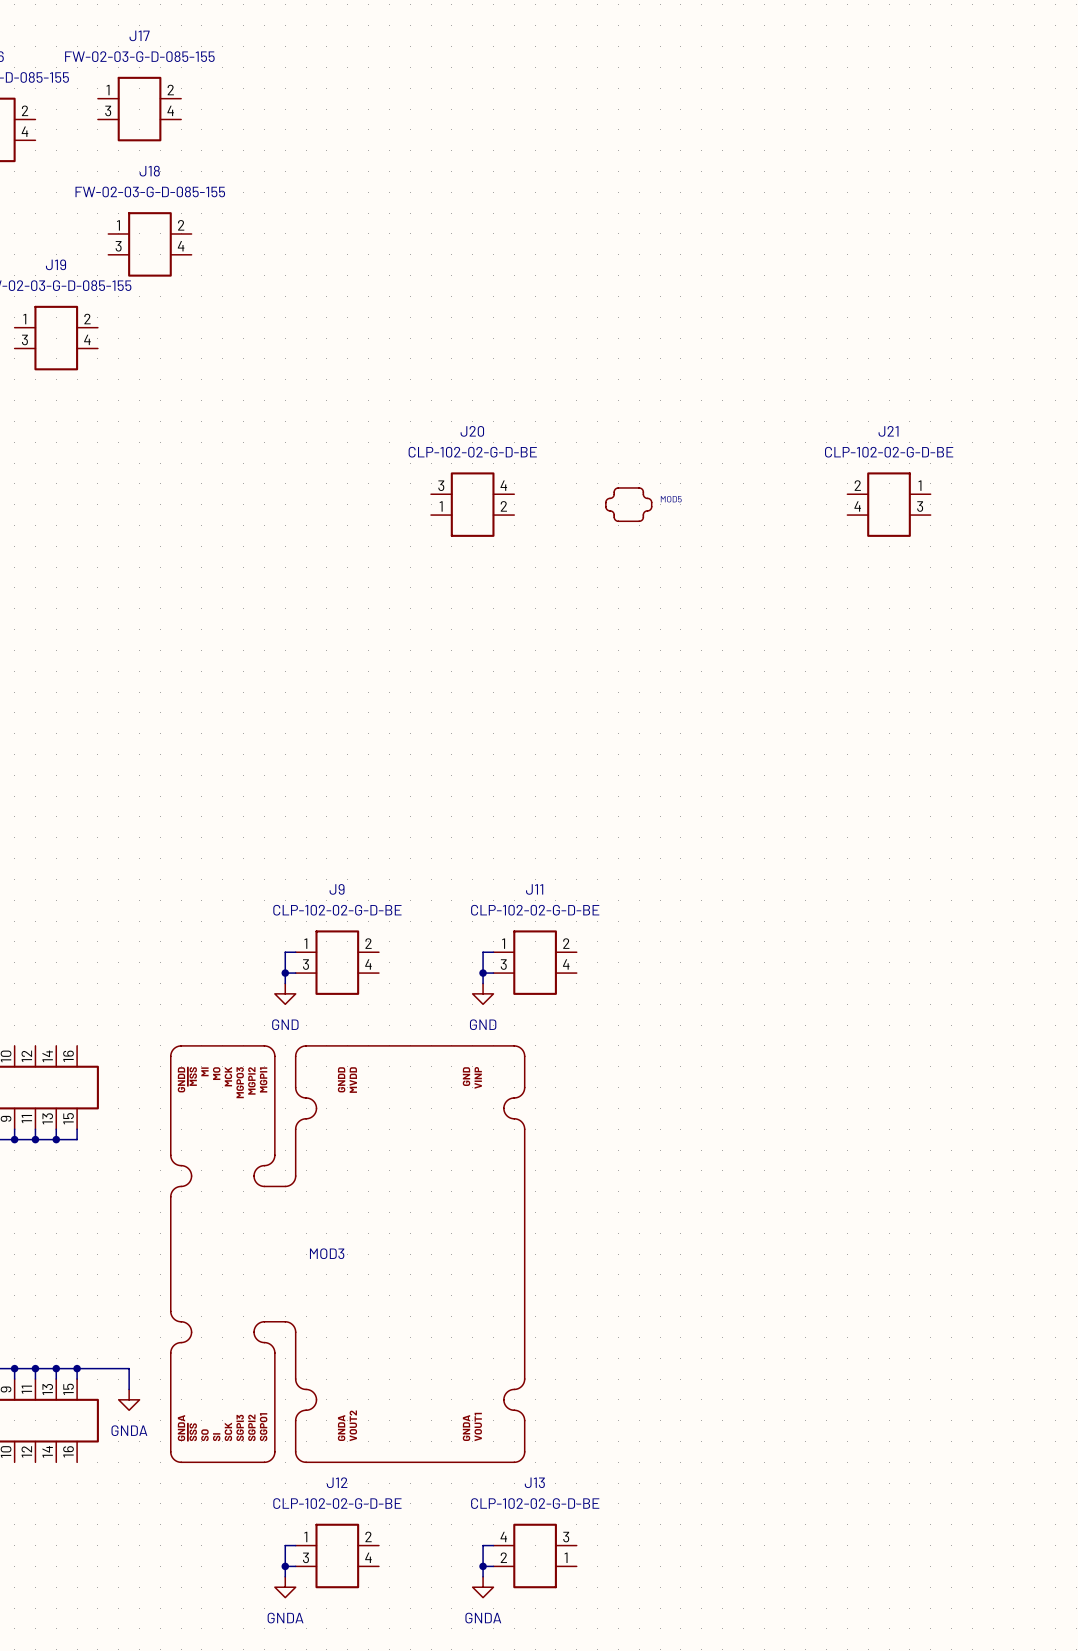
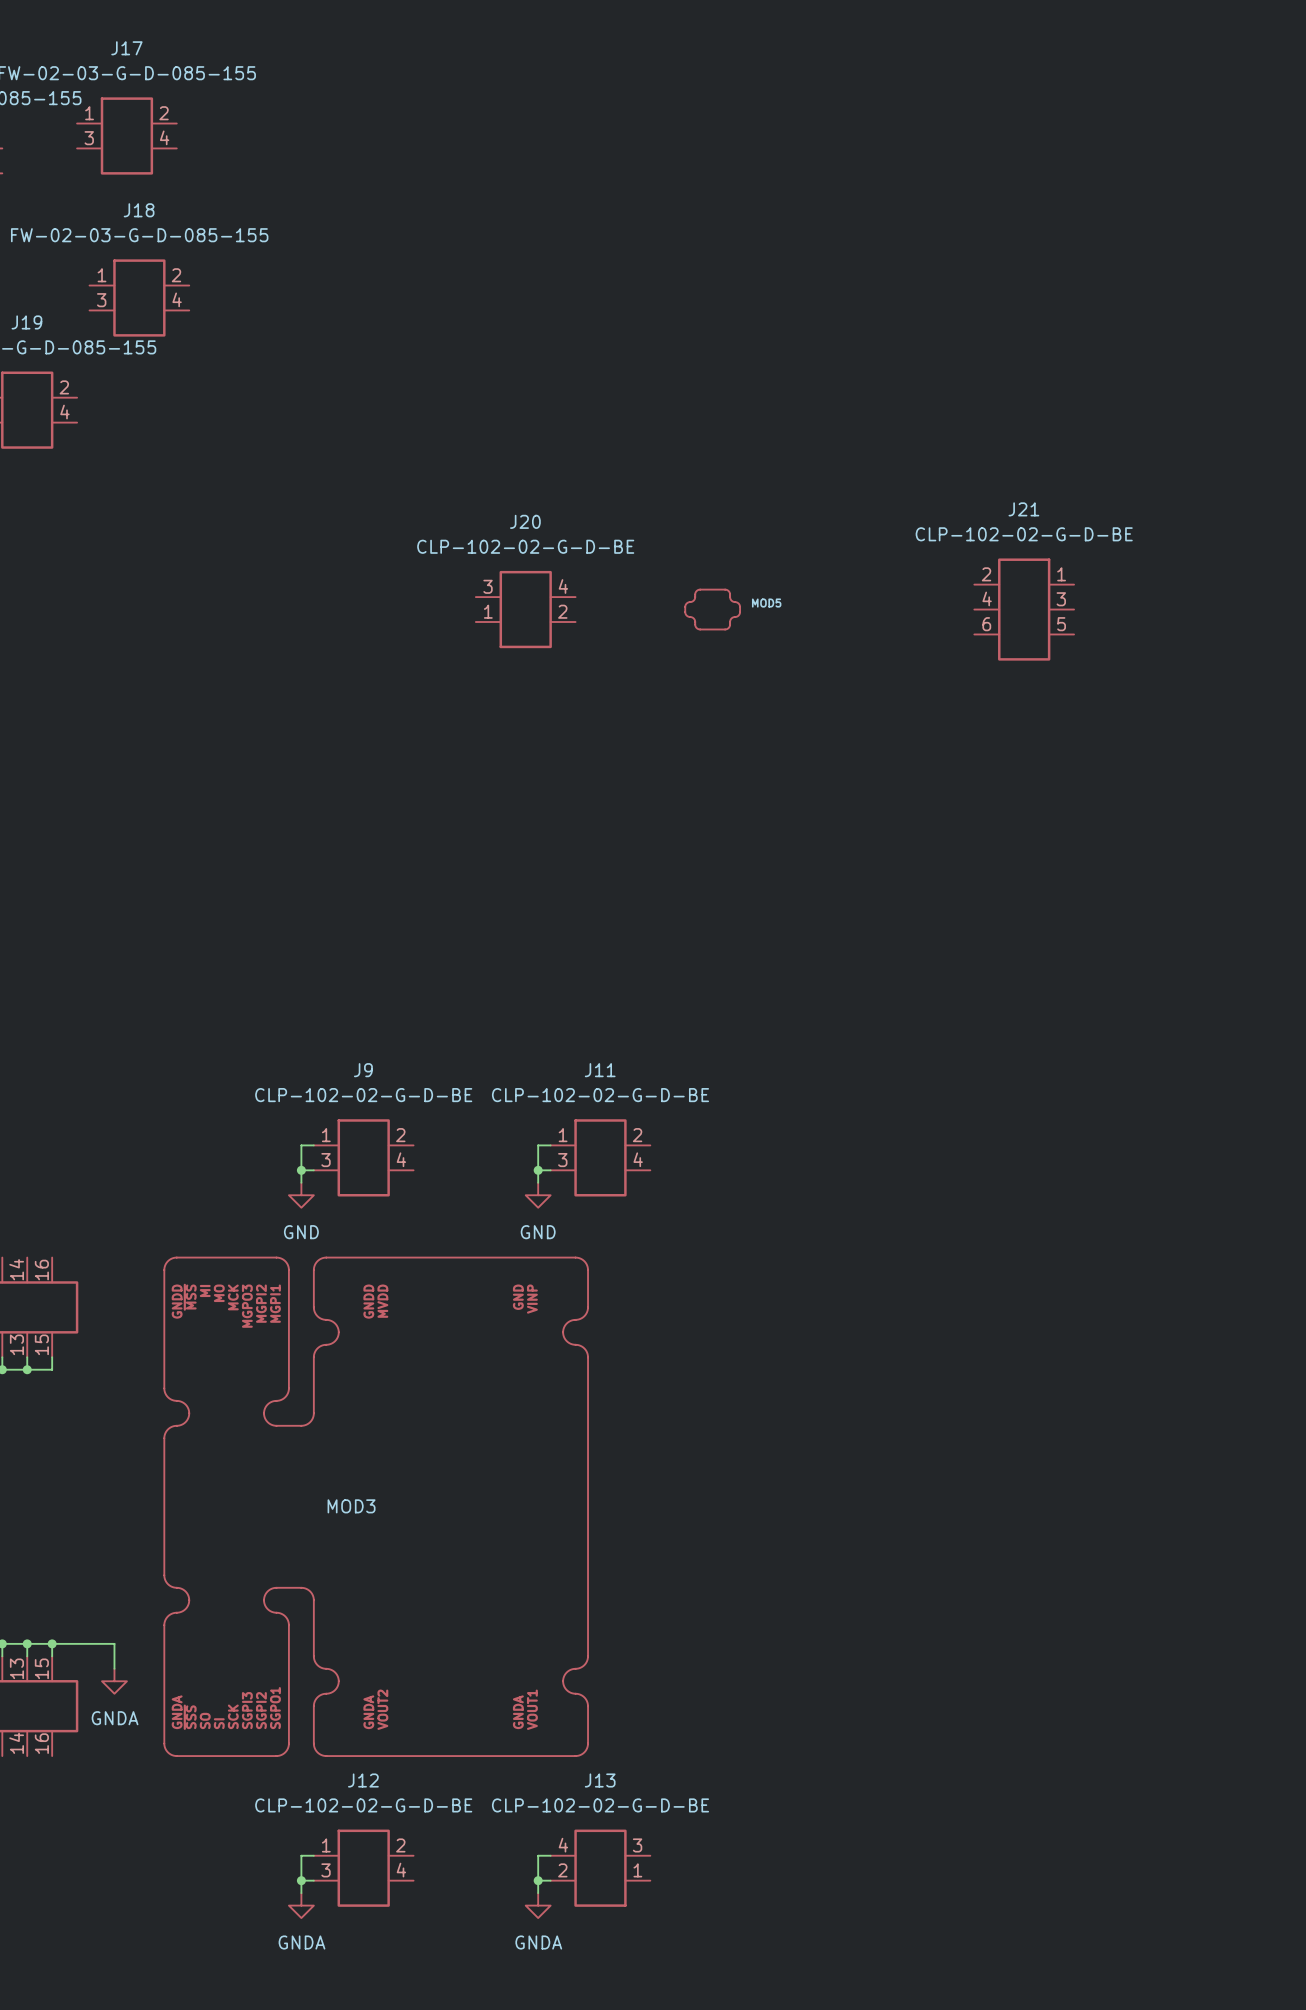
J21 symbol: [847, 472, 931, 537] -> [974, 558, 1075, 661]

